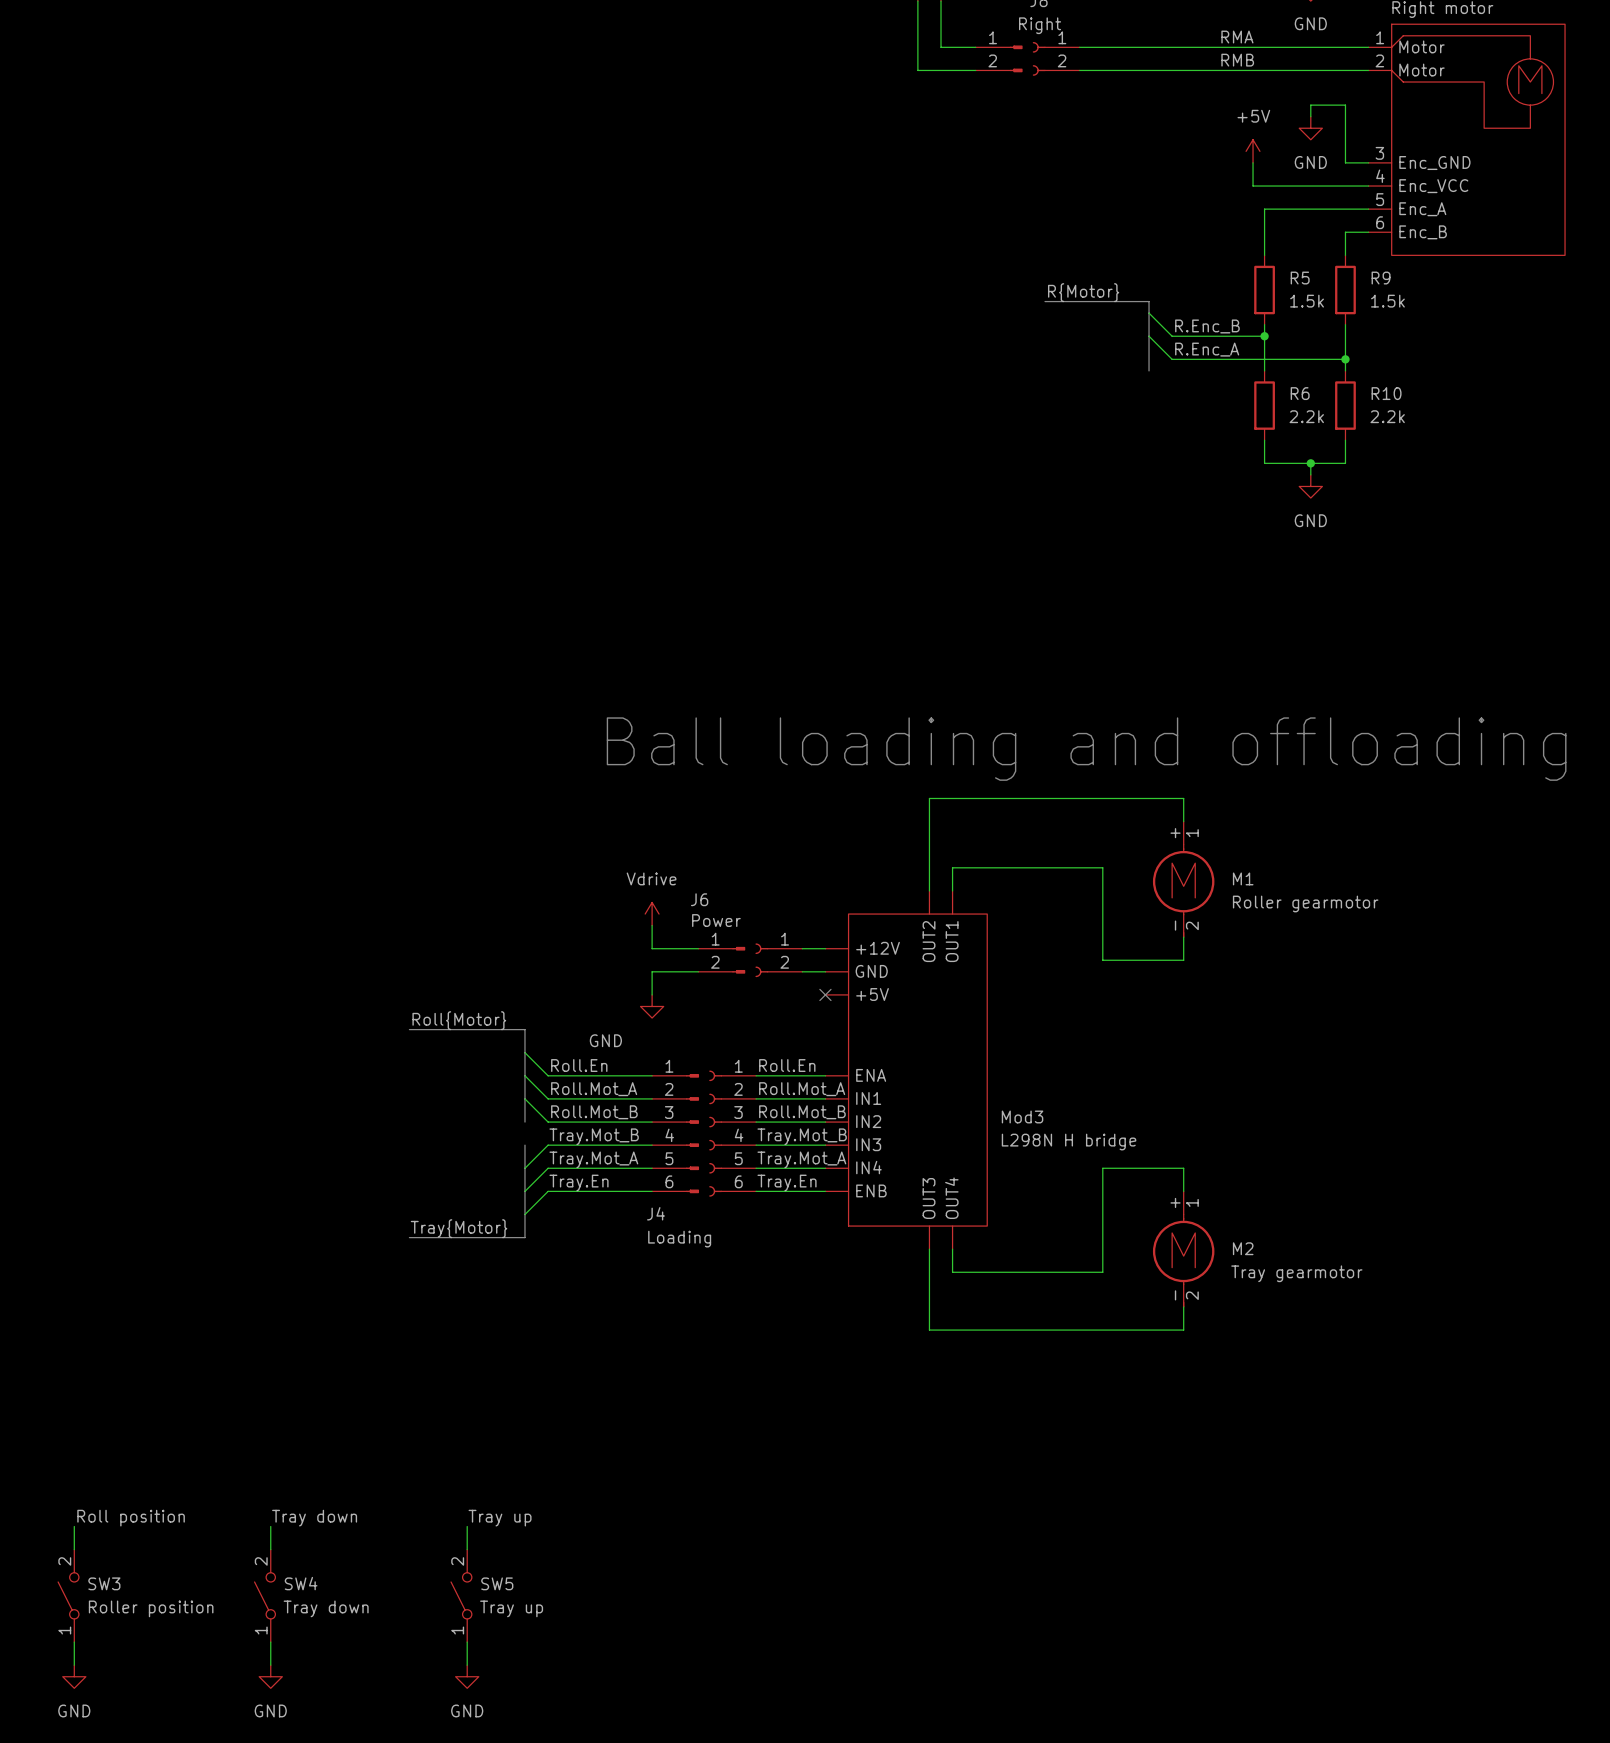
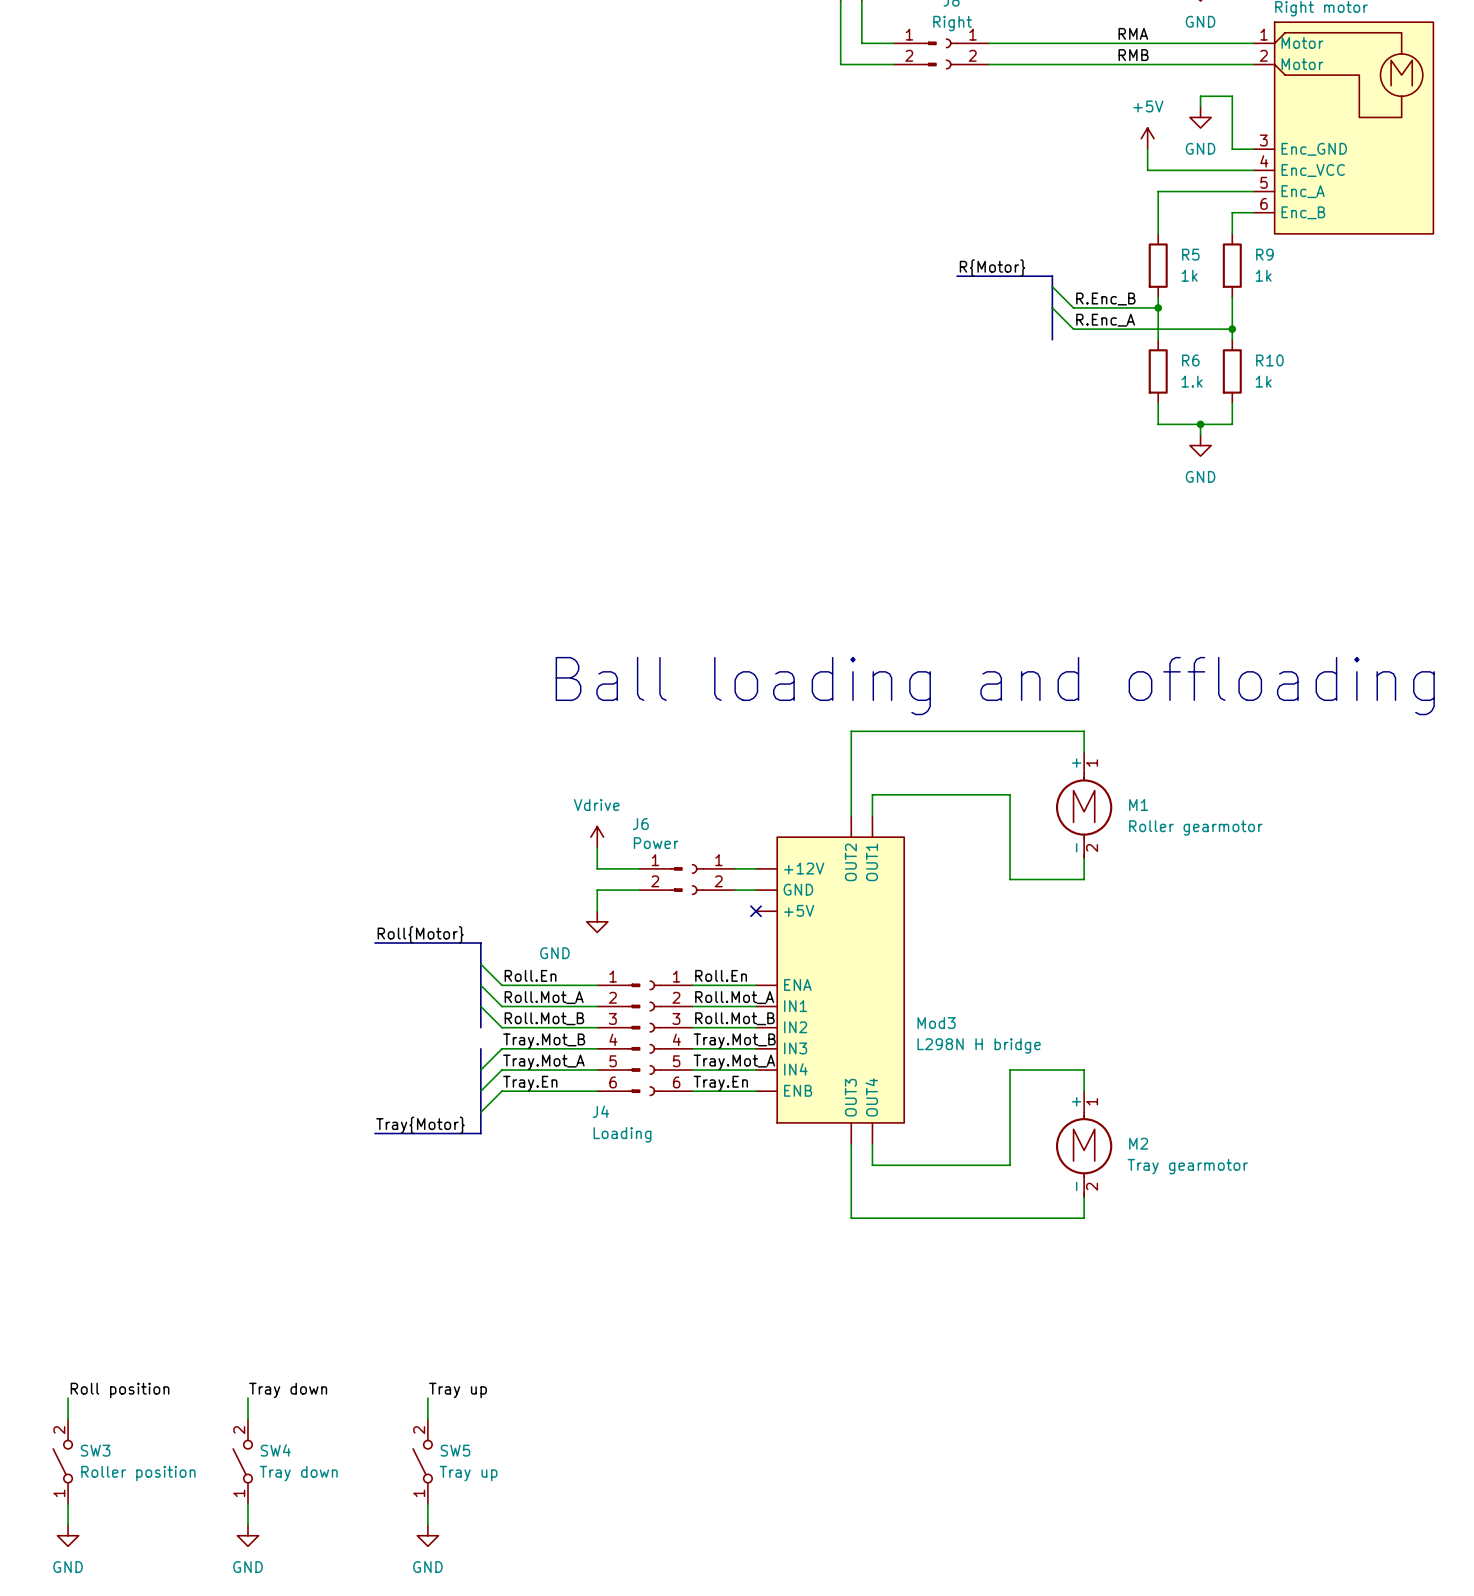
R5 value: 1.5k (1307, 301) -> 1k (1189, 275)
R9 value: 1.5k (1387, 301) -> 1k (1263, 275)
R6 value: 2.2k (1306, 416) -> 1.k (1192, 381)
R10 value: 2.2k (1387, 416) -> 1k (1263, 381)

